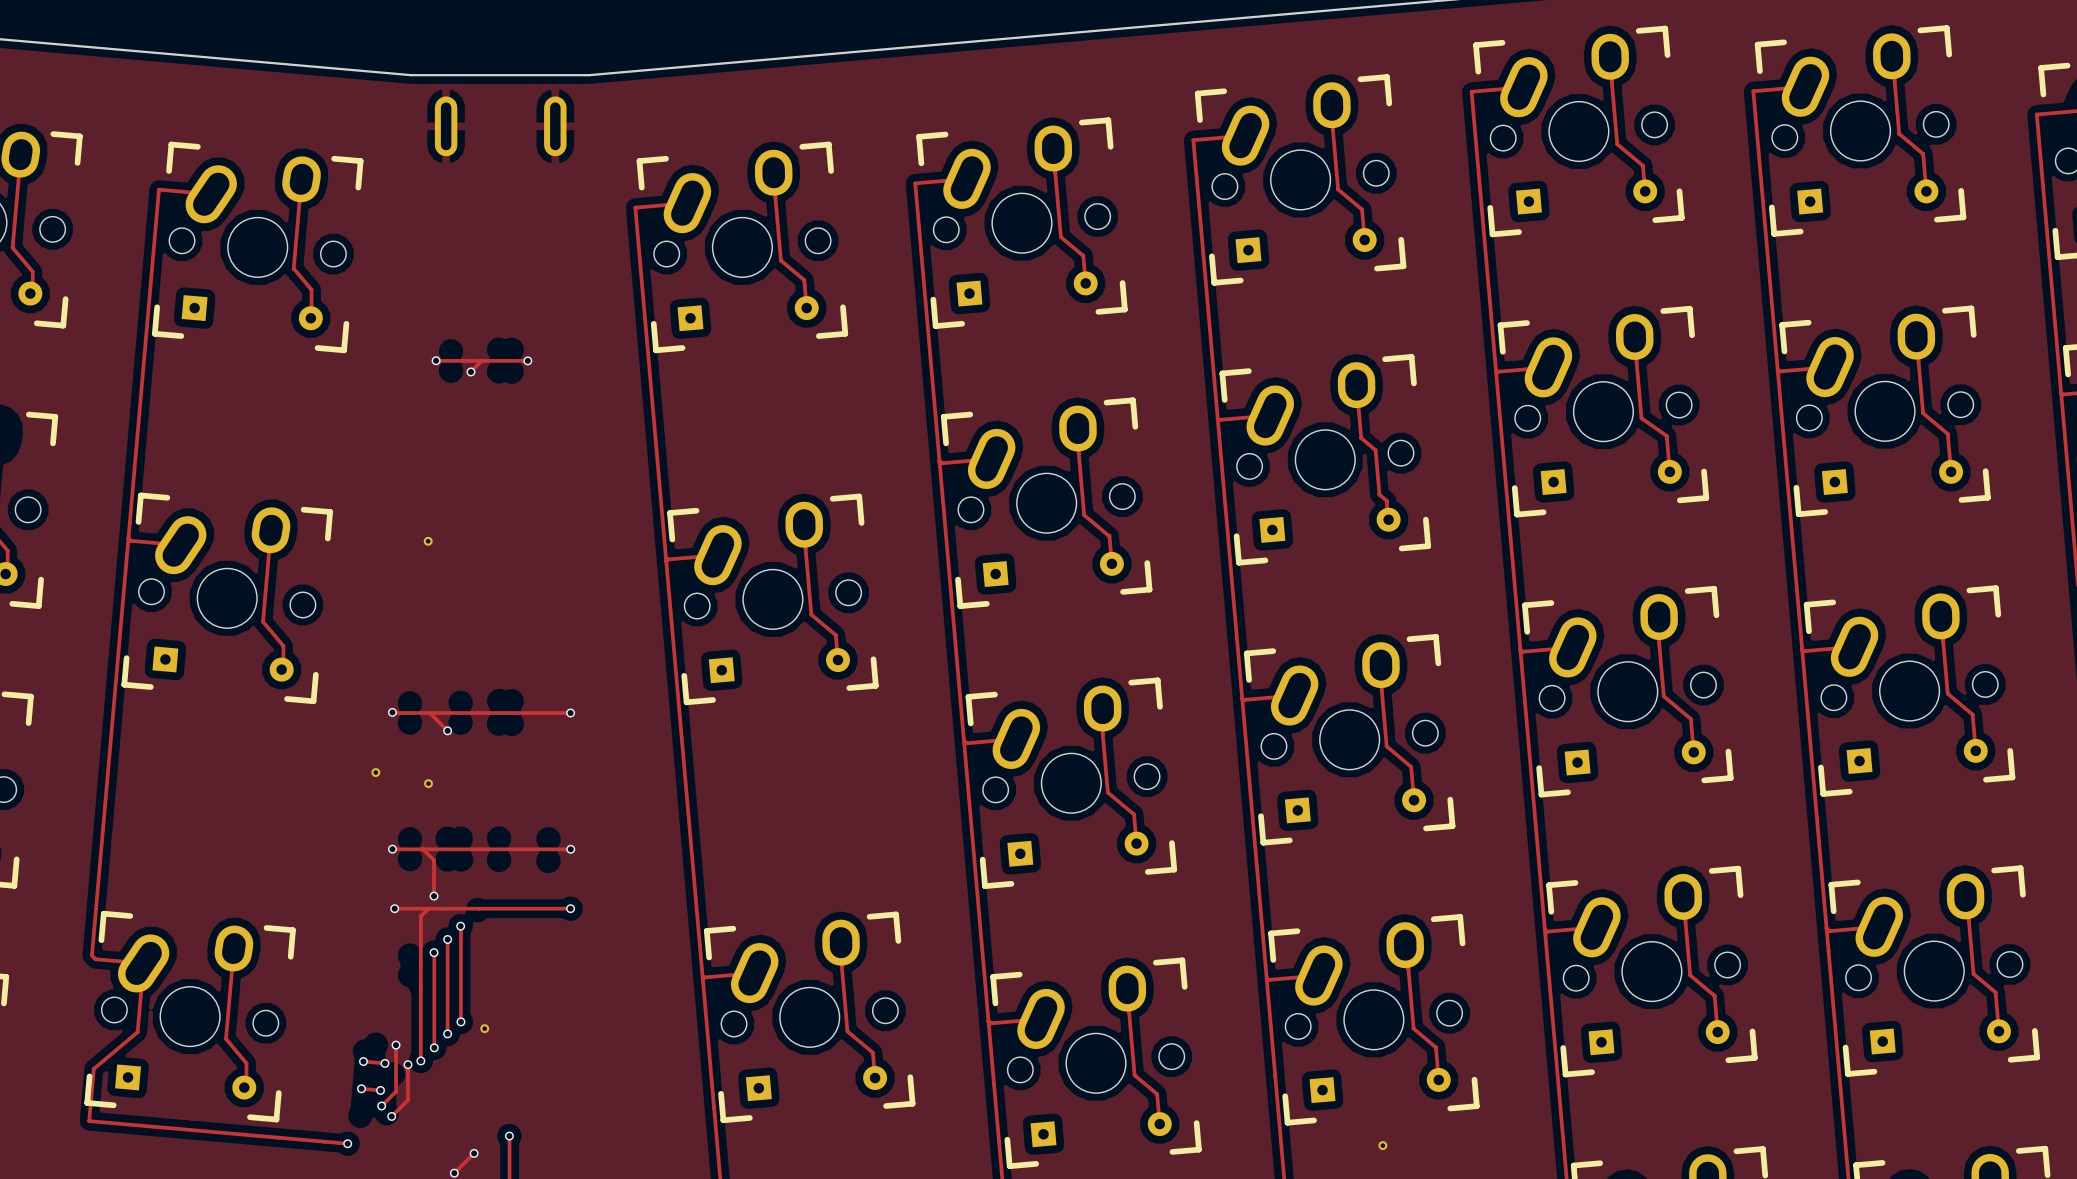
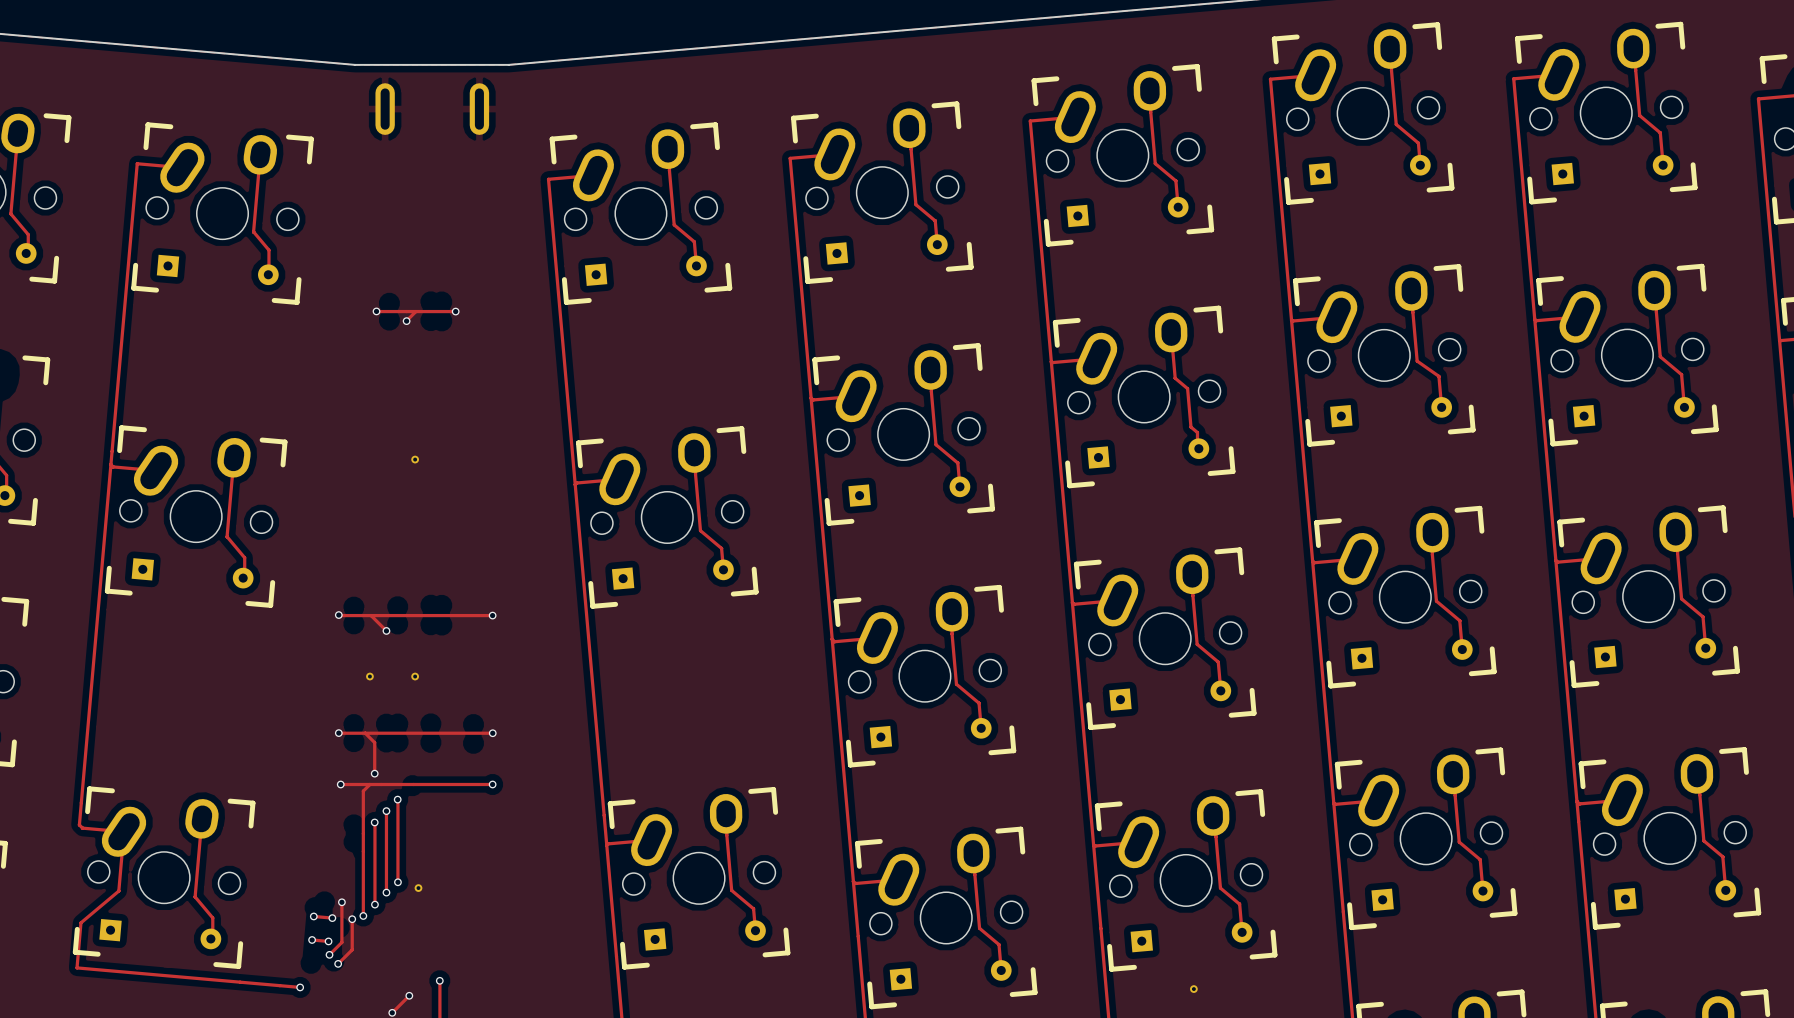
part position: (428, 541) -> (415, 459)
part position: (375, 772) -> (415, 676)

